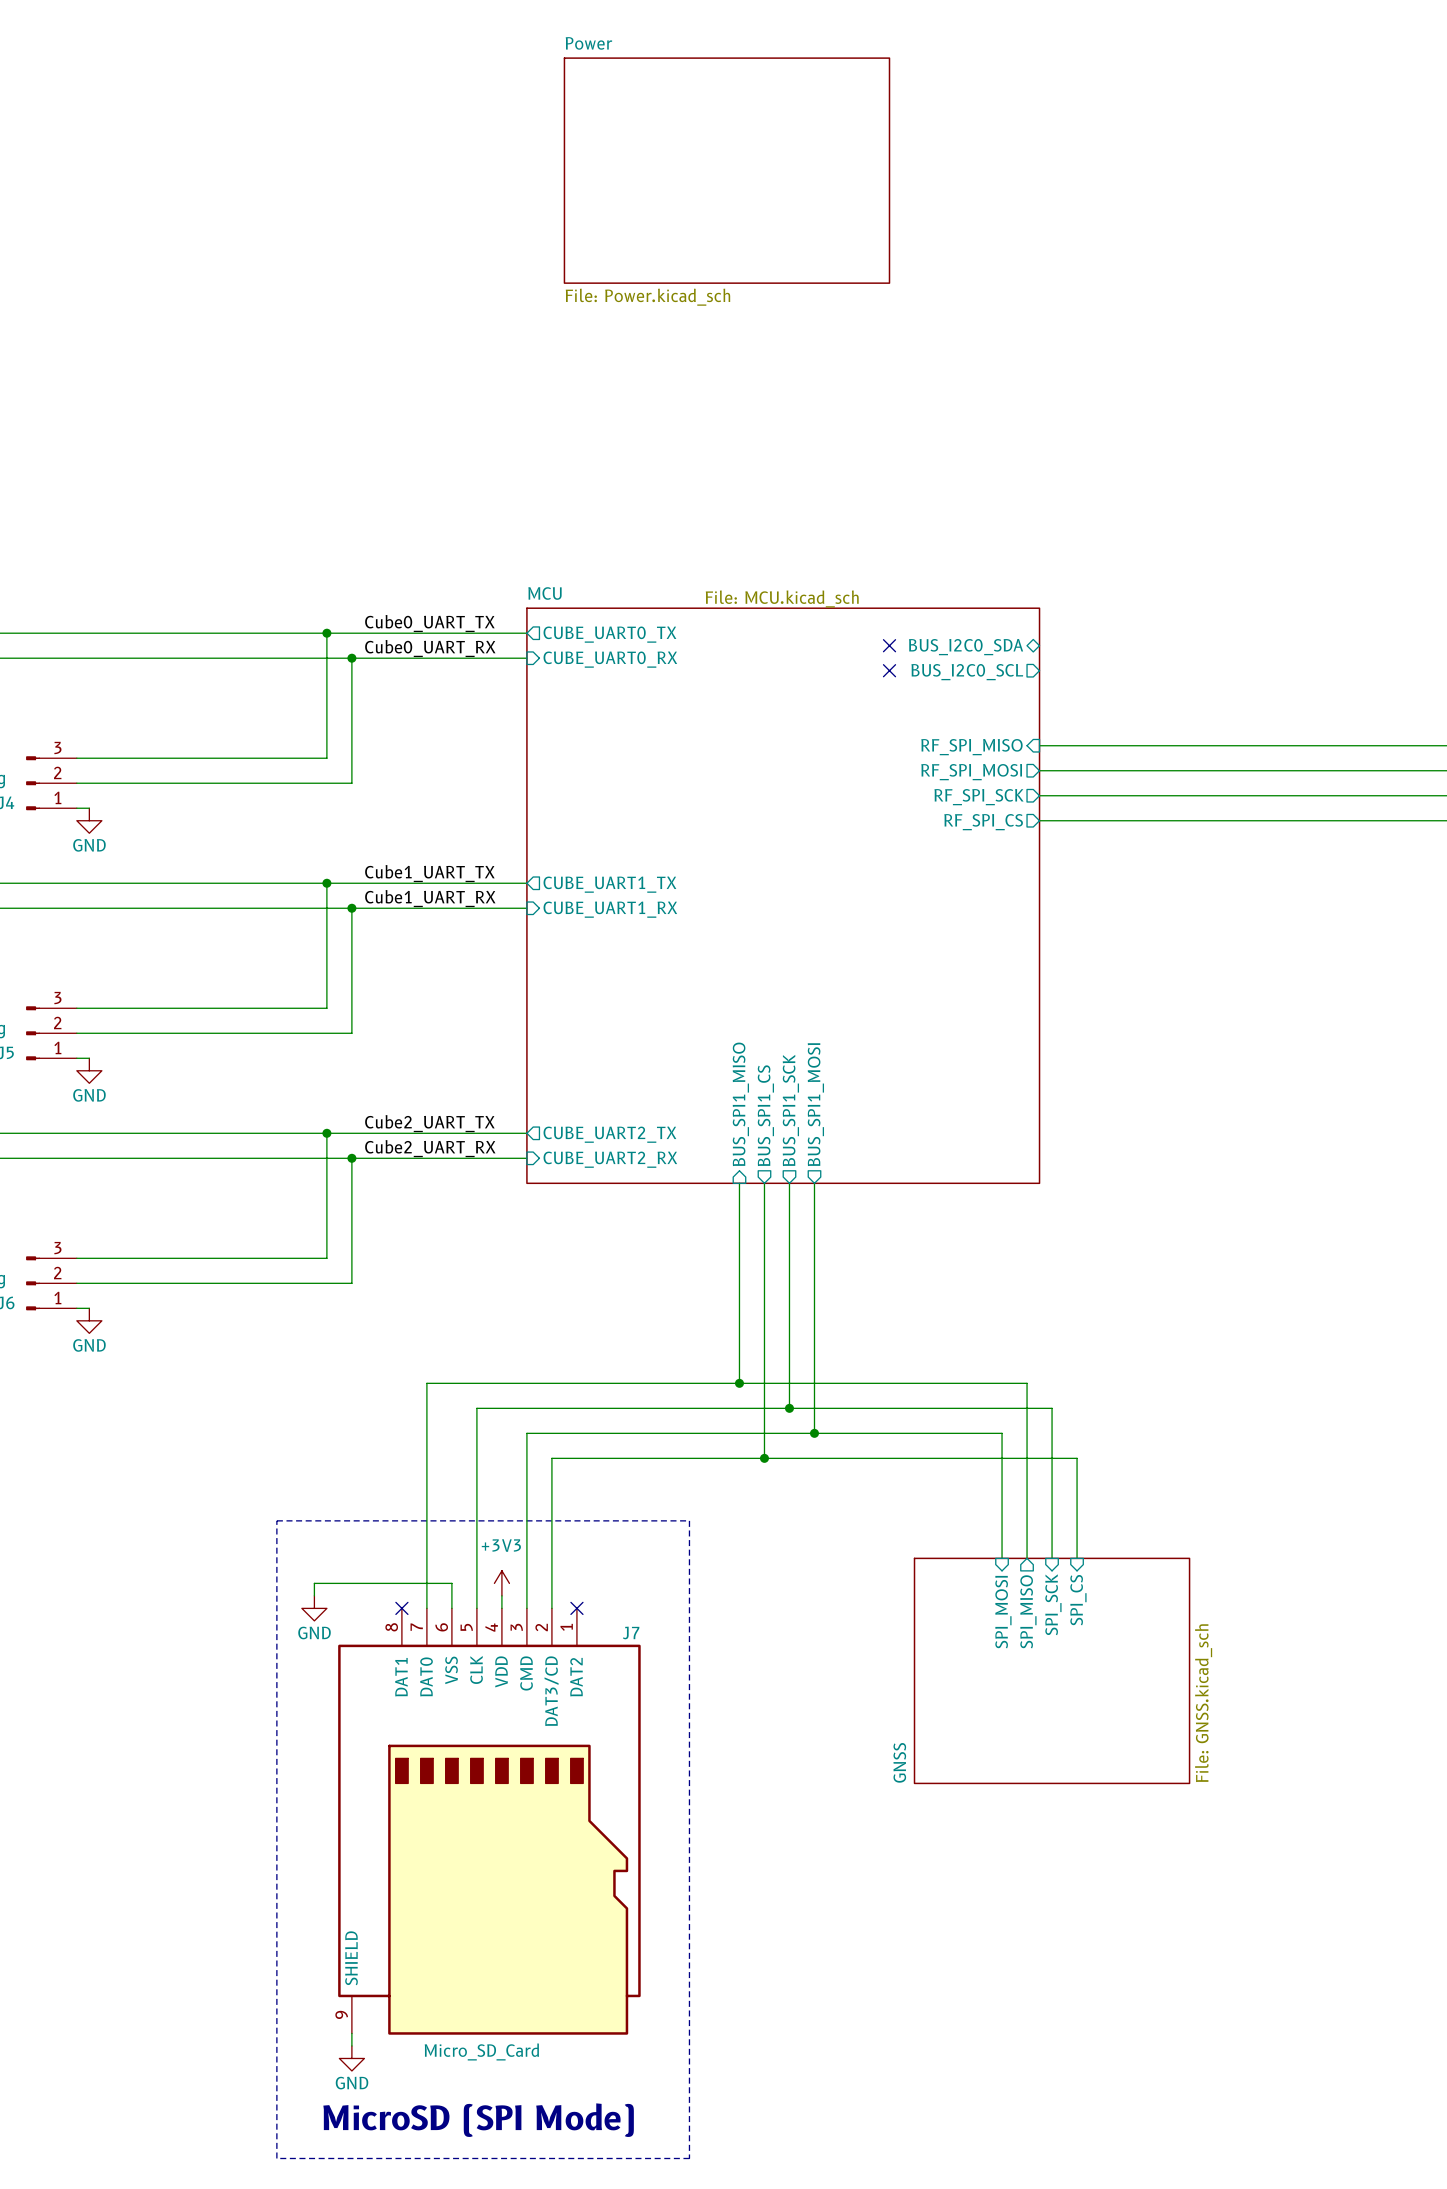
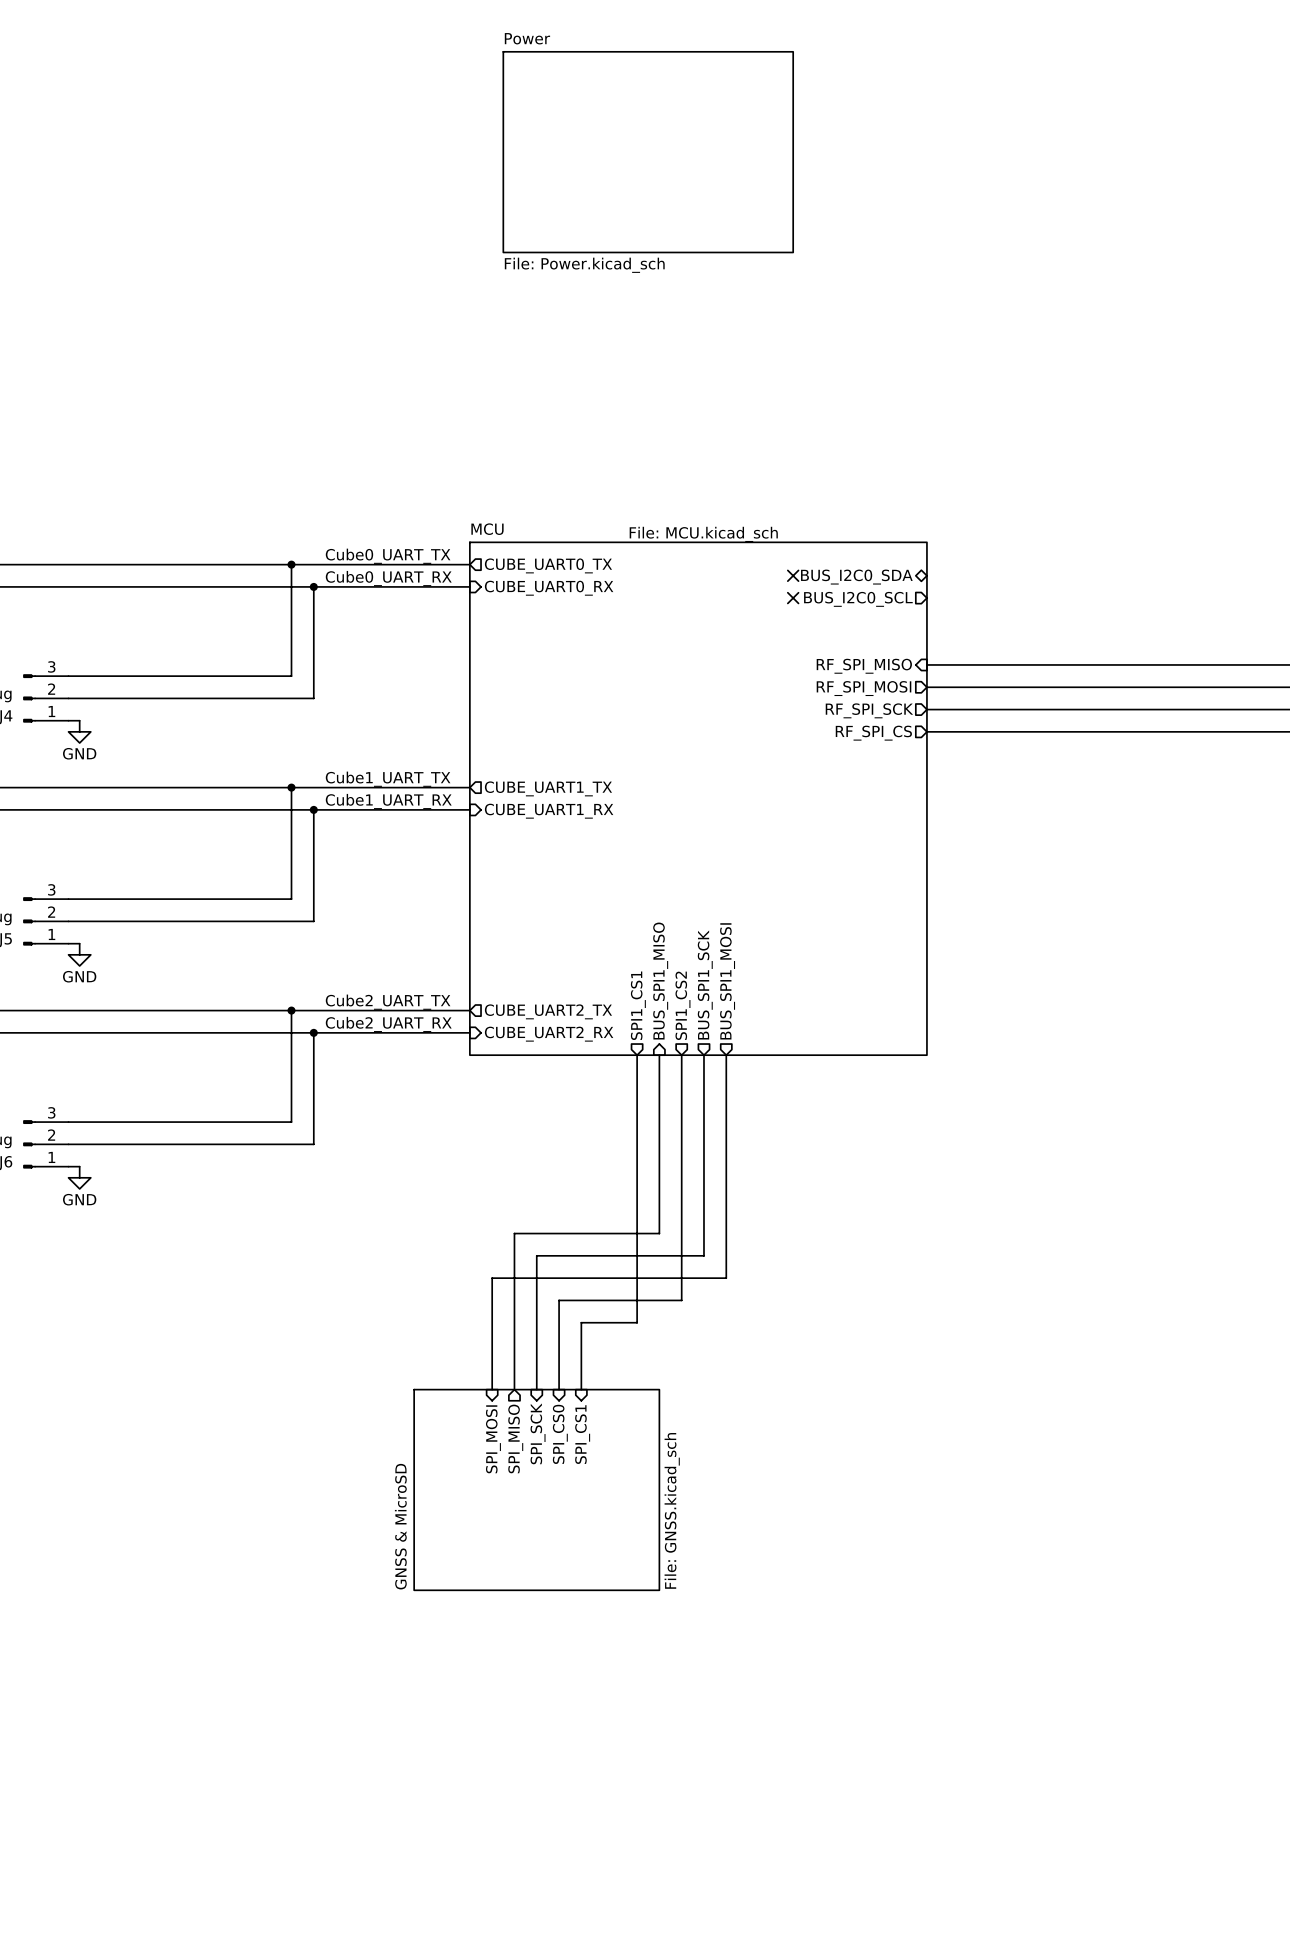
sheet pin: BUS_SPI1_CS (765, 1115) -> SPI1_CS2 (682, 1005)
sheet pin: none -> SPI1_CS1 (638, 1005)
wire: none -> (637, 1055) (637, 1322) (581, 1322) (581, 1389)
wire: (576, 1383) (426, 1383) (426, 1608) -> (514, 1233) (514, 1389)
wire: (739, 1383) (1027, 1383) (1027, 1558) -> none
junction: (739, 1383) -> none
wire: (601, 1408) (476, 1408) (476, 1608) -> (536, 1255) (536, 1389)
wire: (789, 1408) (1052, 1408) (1052, 1558) -> none
junction: (789, 1408) -> none
wire: (551, 1433) (526, 1433) (526, 1608) -> none
wire: (814, 1433) (1002, 1433) (1002, 1558) -> none
junction: (814, 1433) -> none
wire: (551, 1458) (626, 1458) -> (492, 1300) (492, 1278)
wire: none -> (559, 1300) (559, 1389)
wire: (764, 1458) (1077, 1458) (1077, 1558) -> none
junction: (764, 1458) -> none
line: (276, 1520) (689, 1520) (689, 2158) (276, 2158) (276, 1520) -> none
wire: (551, 1558) (551, 1608) -> none
power symbol: +3V3 (501, 1583) -> none
wire: (314, 1595) (314, 1583) (451, 1583) (451, 1608) -> none
wire: (501, 1595) (501, 1608) -> none
sheet pin: SPI_CS (1078, 1600) -> none
sheet pin: none -> SPI_SCK (538, 1433)
sheet pin: SPI_SCK (1053, 1604) -> none
sheet pin: none -> SPI_CS0 (560, 1434)
sheet pin: none -> SPI_CS1 (582, 1434)
power symbol: GND (314, 1608) -> none
no-connect mark: (401, 1608) -> none
no-connect mark: (576, 1608) -> none
sheet pin: none -> SPI_MISO (515, 1438)
sheet pin: SPI_MISO (1028, 1611) -> none
sheet pin: none -> SPI_MOSI (493, 1439)
sheet pin: SPI_MOSI (1003, 1612) -> none
sheet GNSS & MicroSD: none -> File: GNSS.kicad_sch (536, 1489)
sheet GNSS: File: GNSS.kicad_sch (1052, 1670) -> none
J7: Micro_SD_Card (489, 1821) -> none
wire: (351, 2033) (351, 2045) -> none
power symbol: GND (351, 2058) -> none
text: MicroSD (SPI Mode) (478, 2120) -> none

